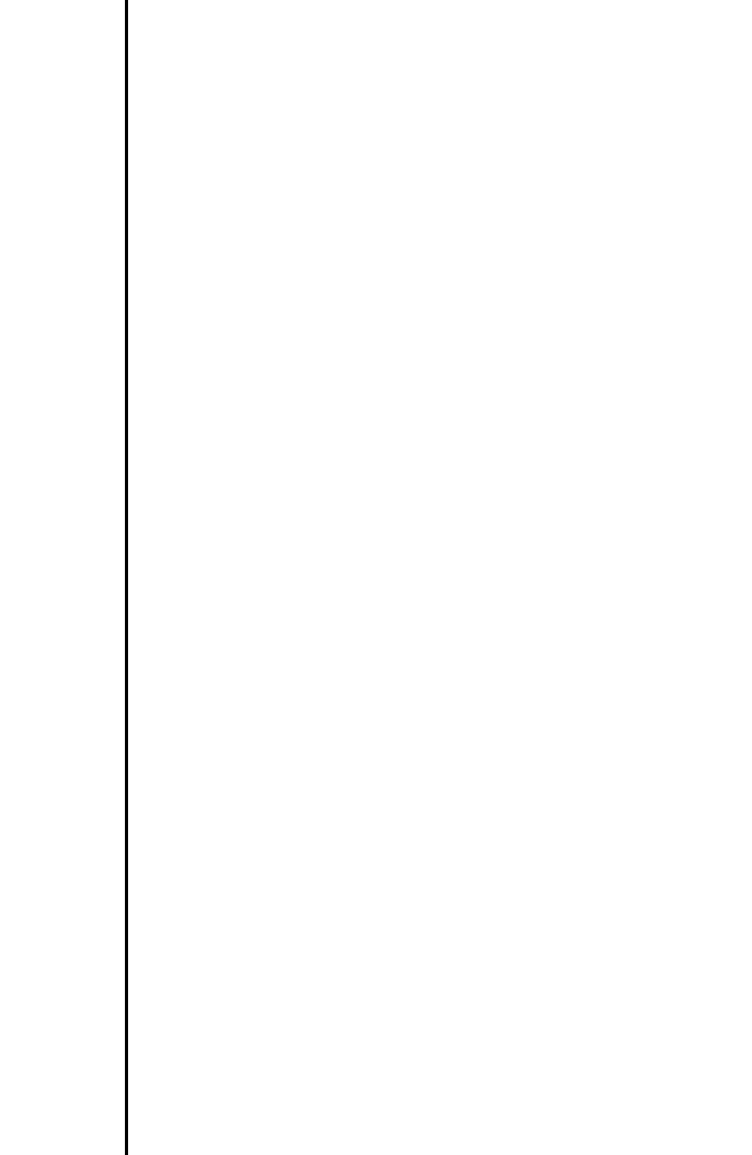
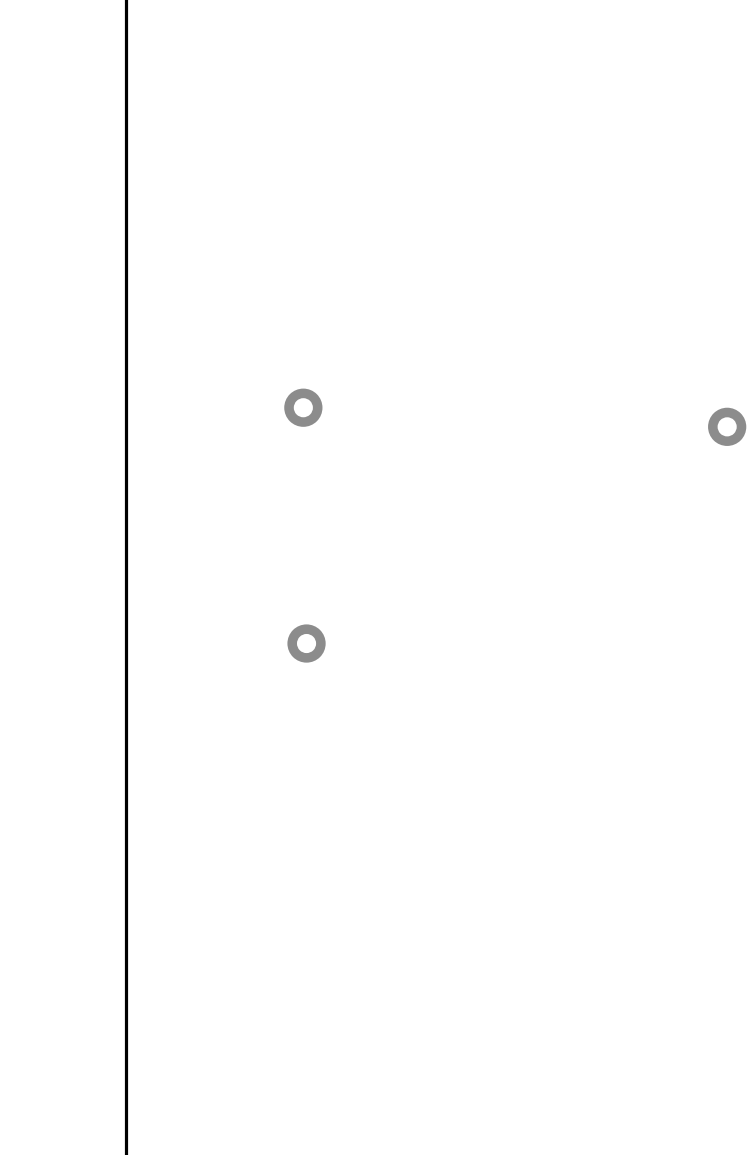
via: none -> (303, 407)
via: none -> (727, 426)
via: none -> (306, 643)

